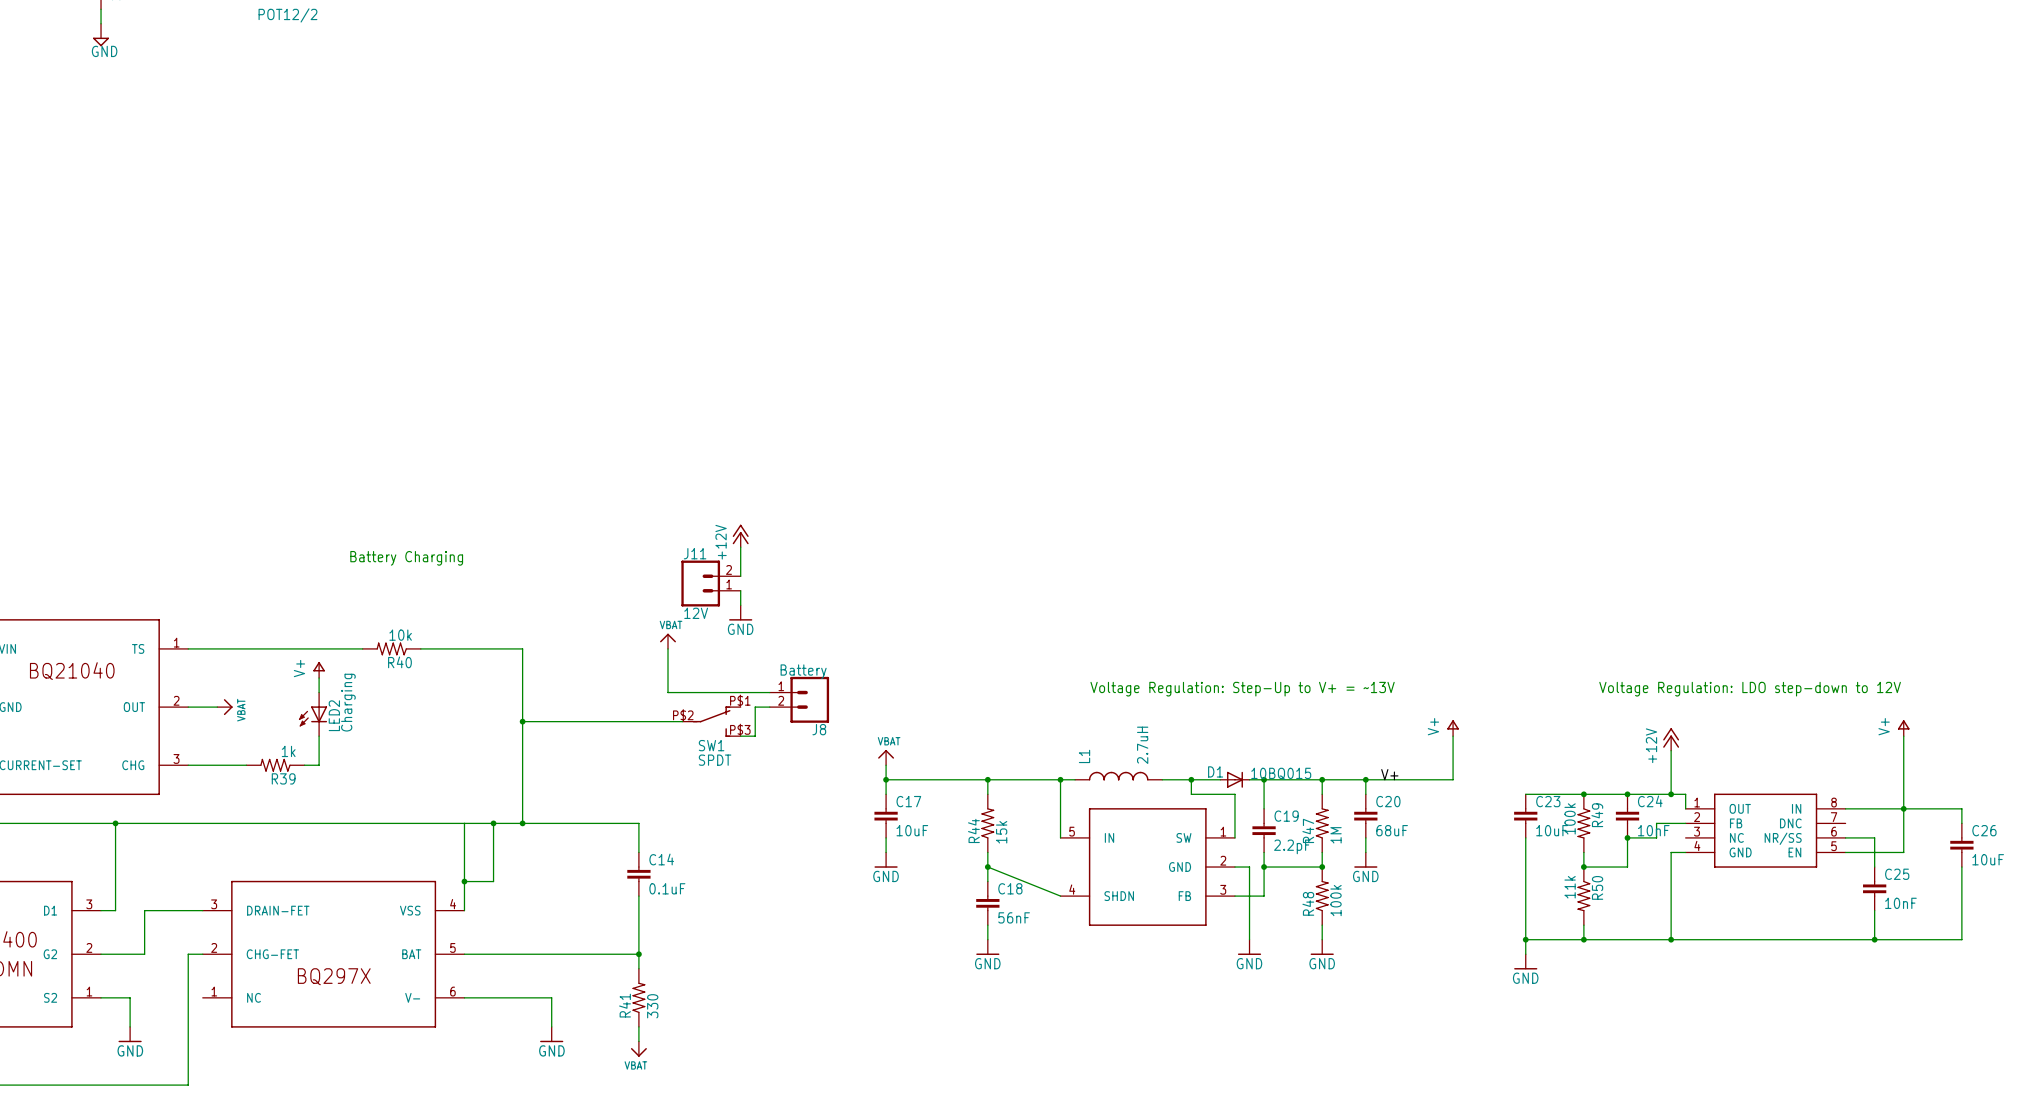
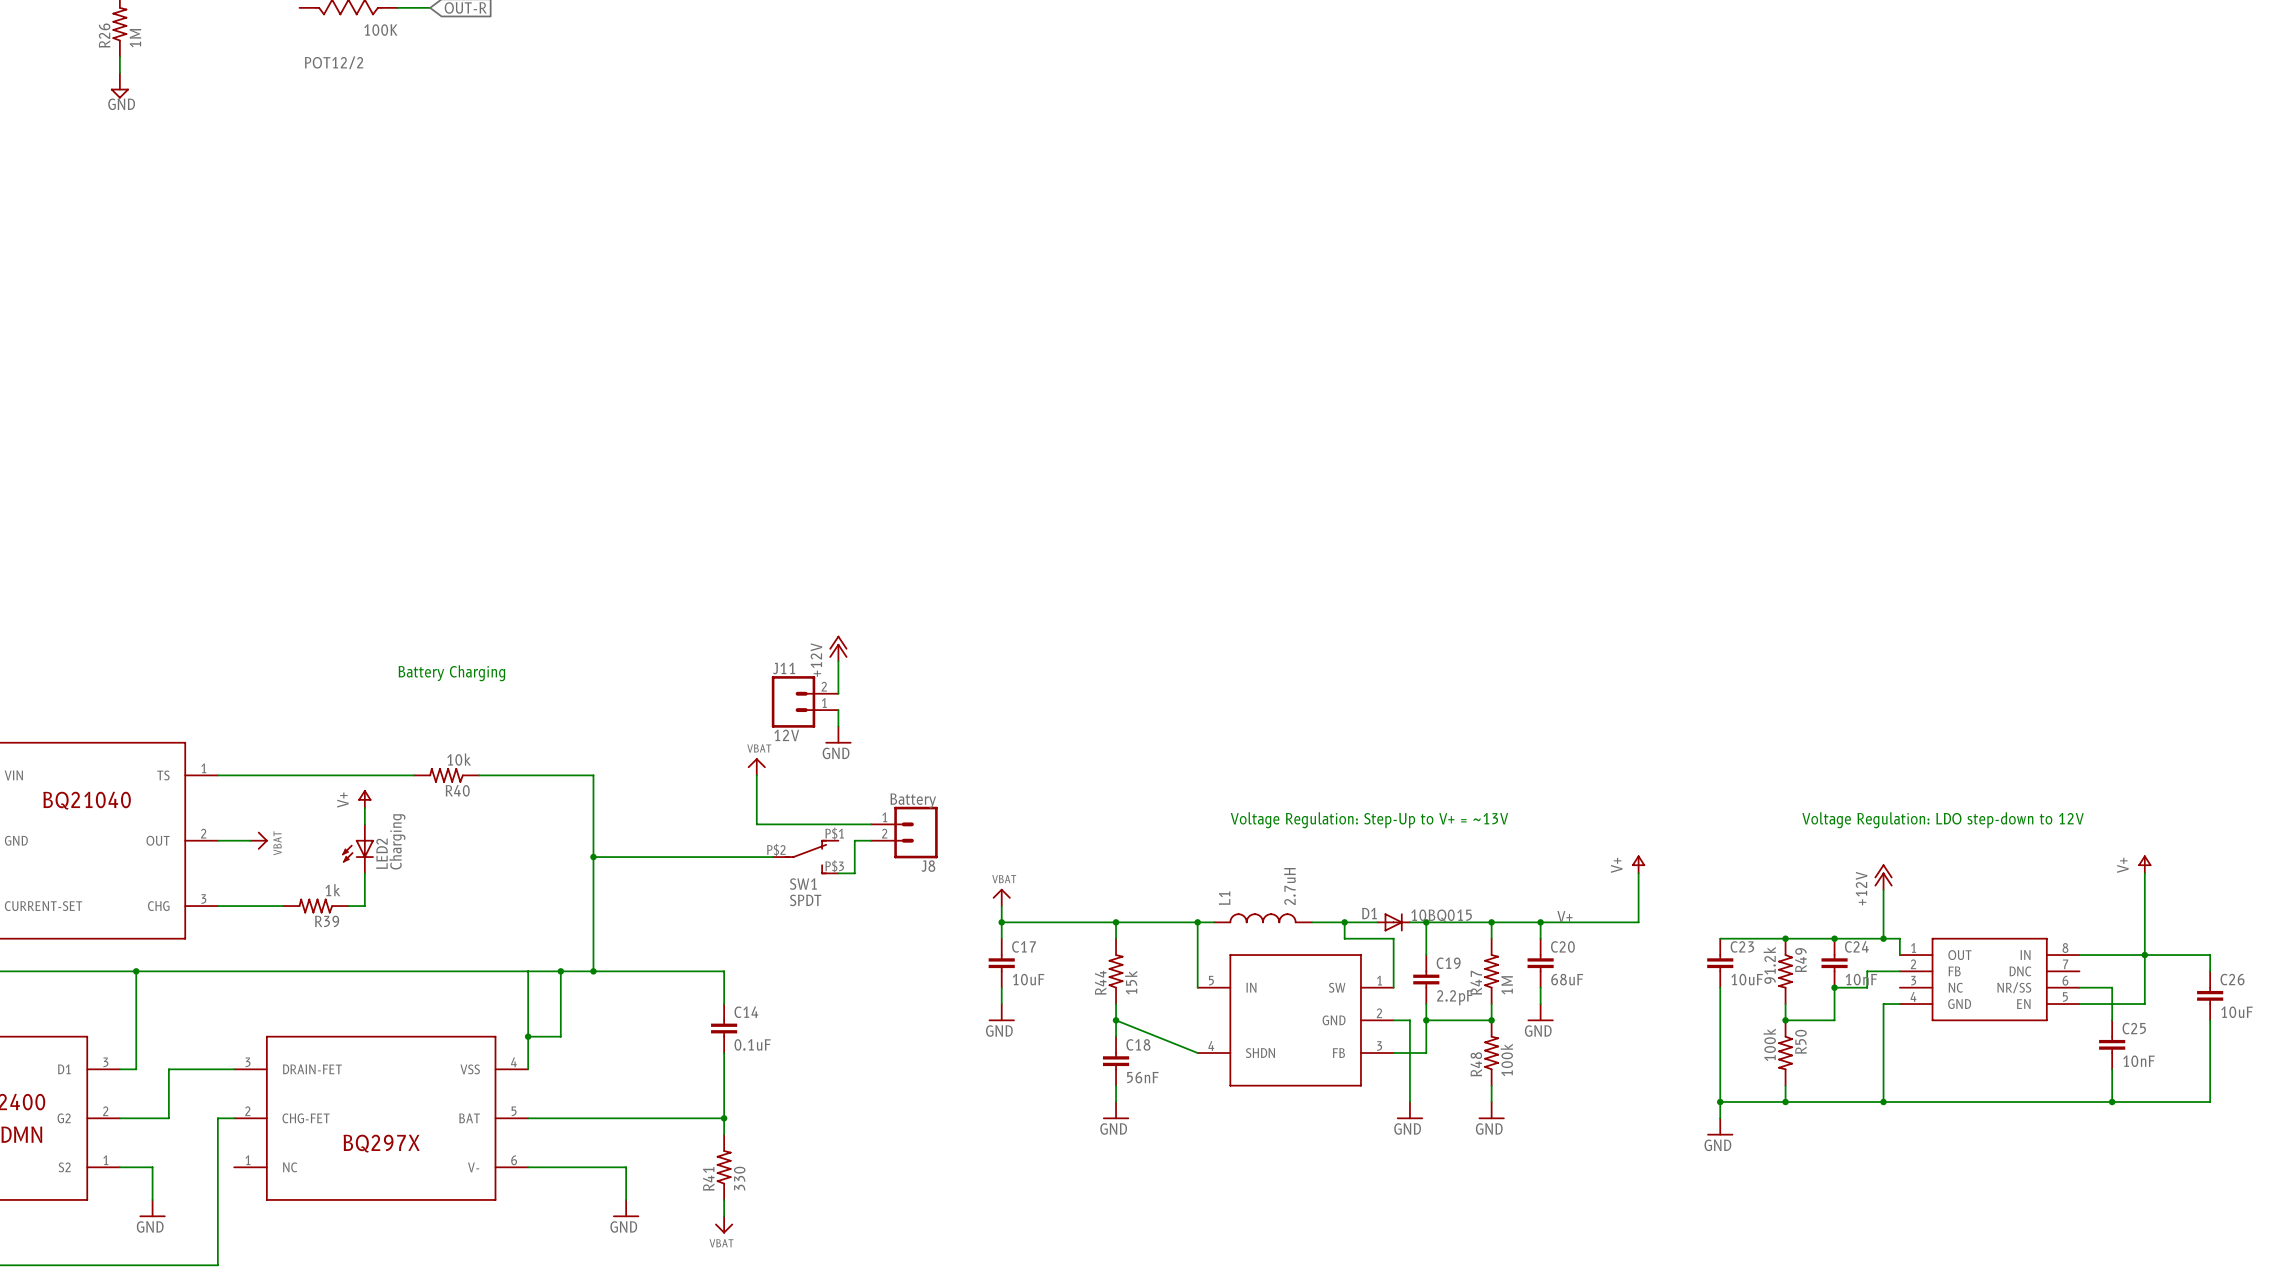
R49 value: 100k (1570, 818) -> 91.2k (1769, 965)
R50 value: 11k (1570, 887) -> 100k (1769, 1044)

